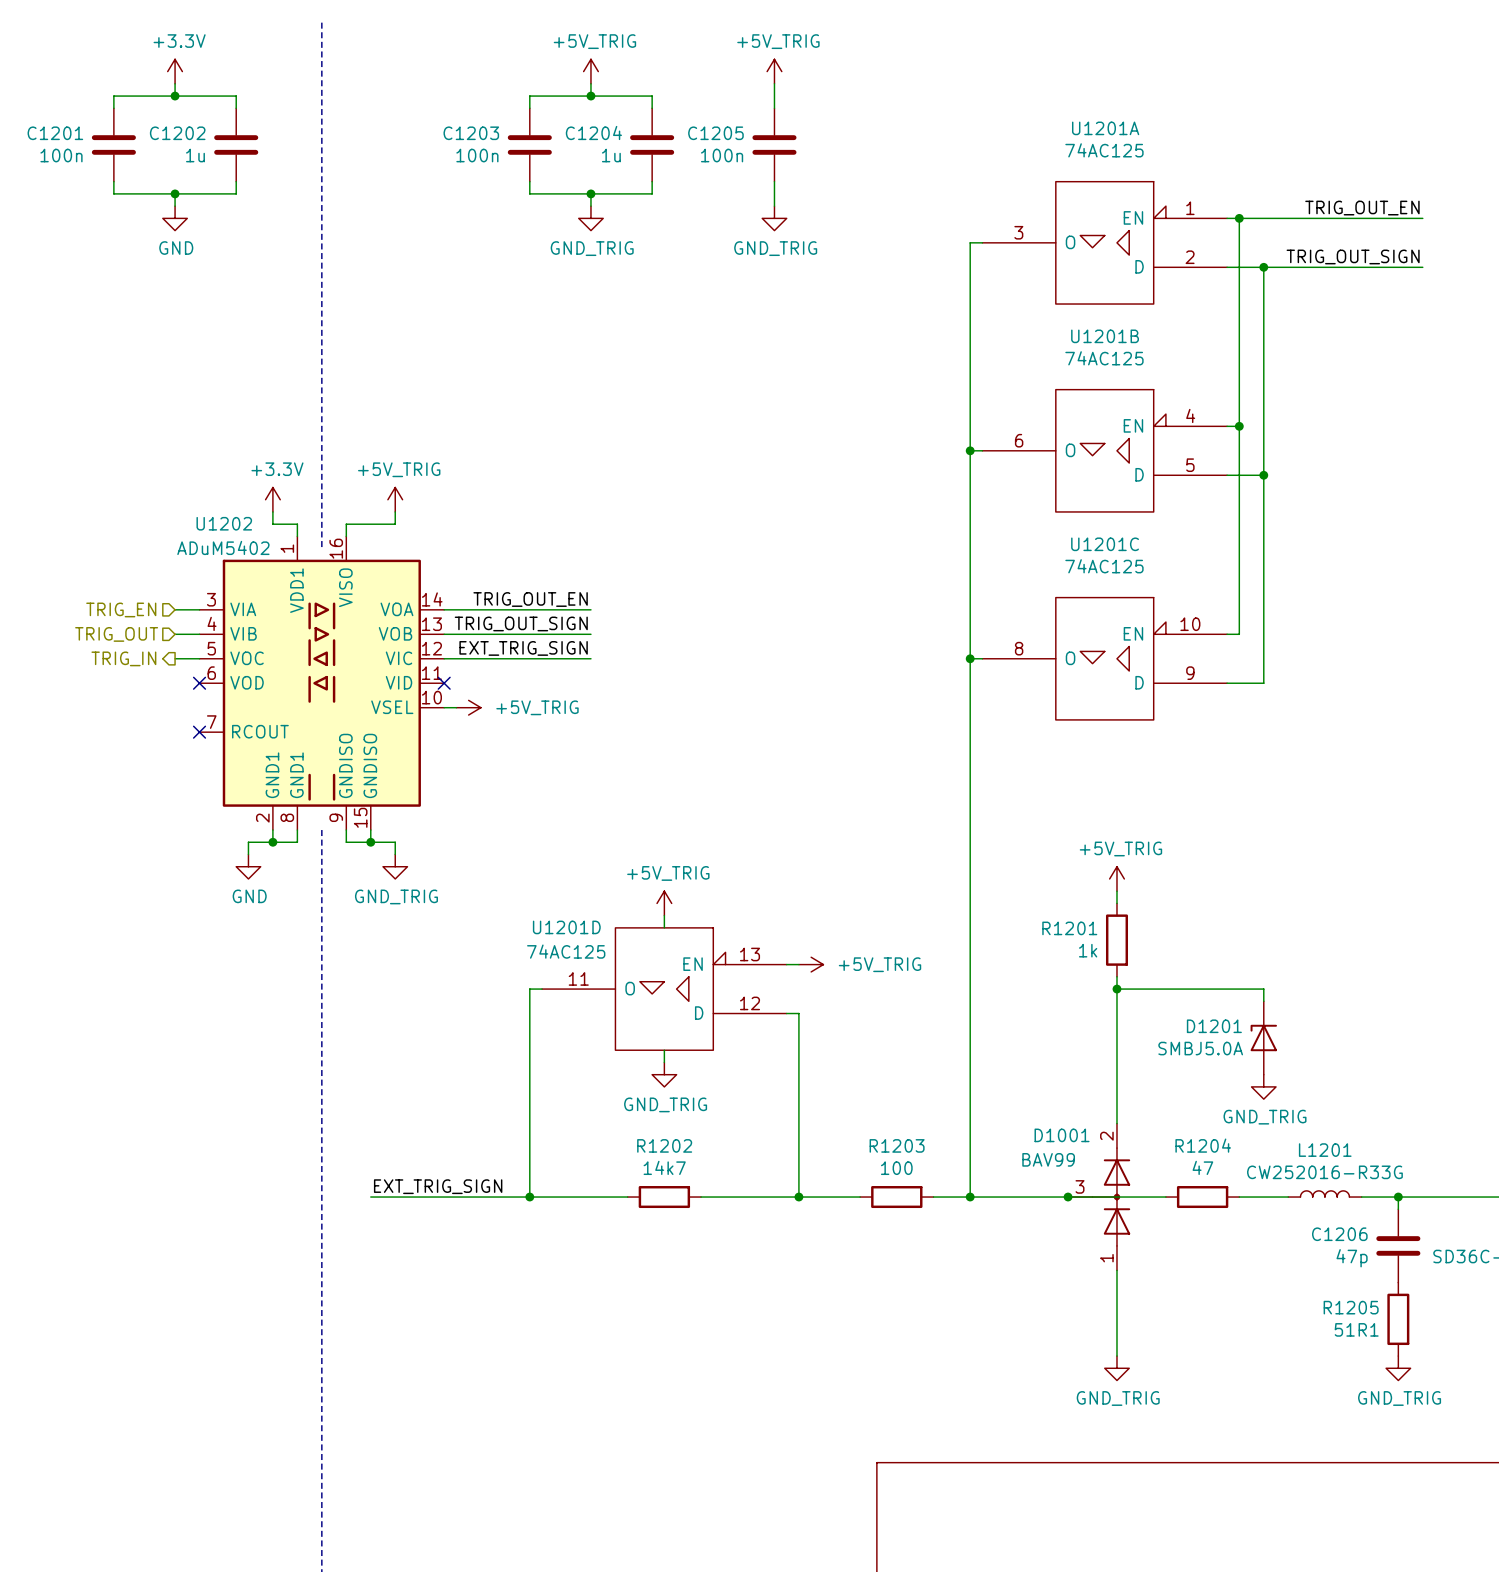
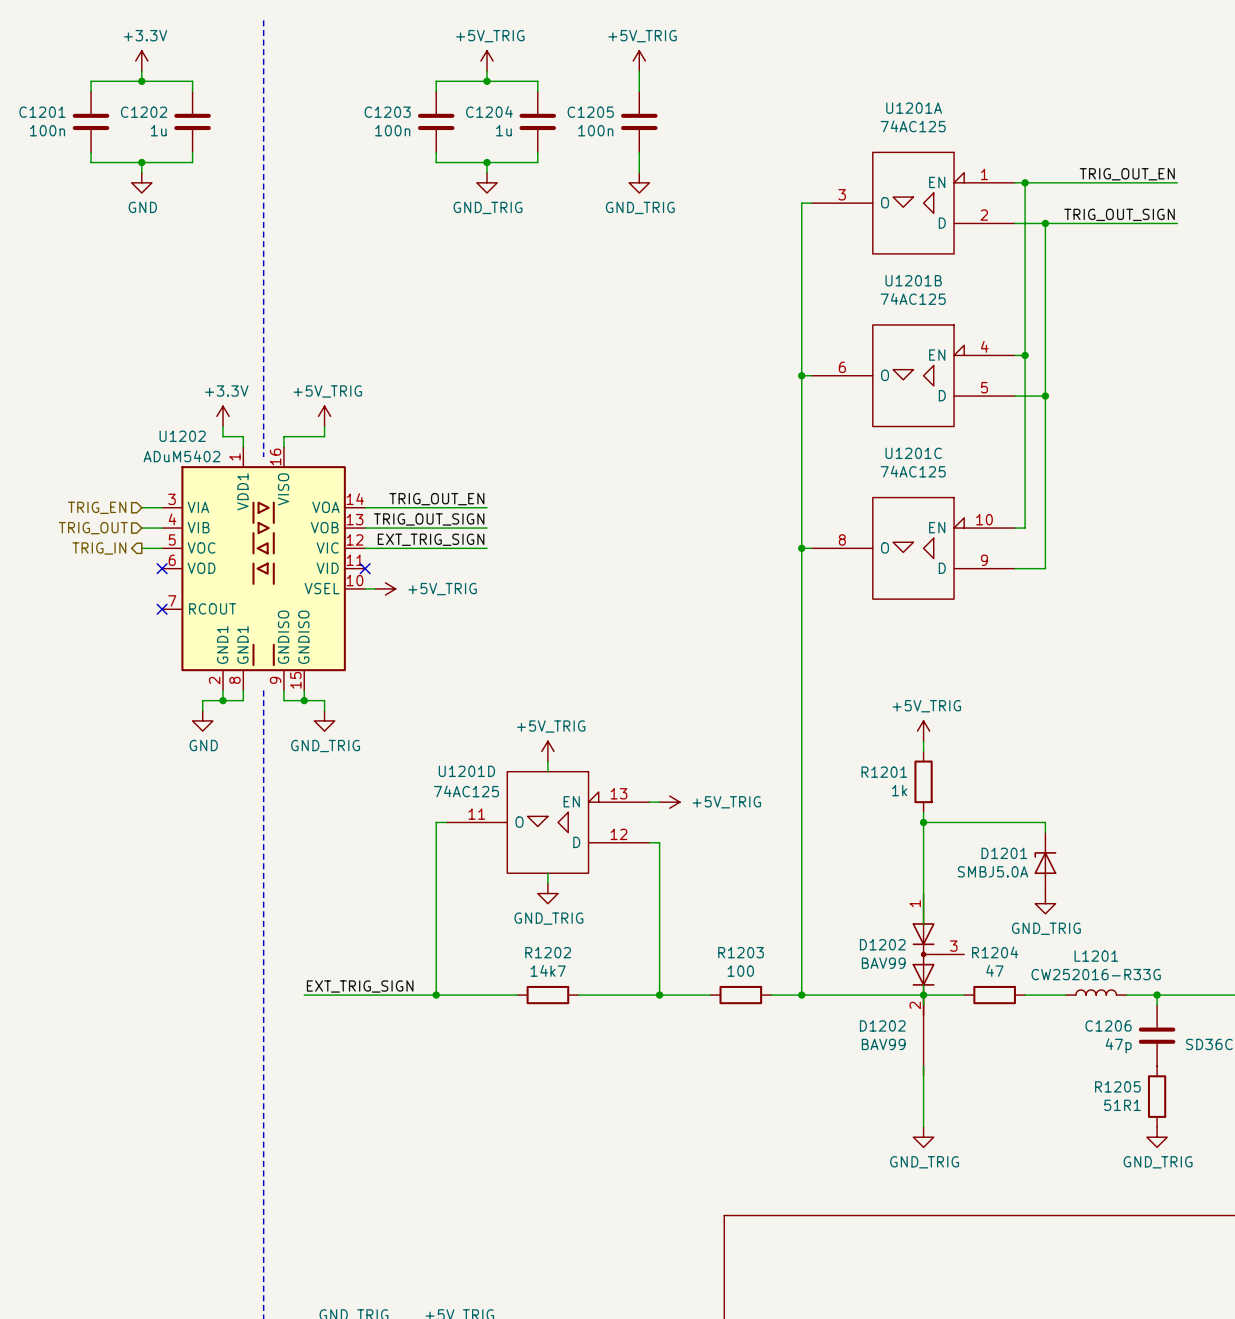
D1202: none -> BAV99 (938, 954)
junction position: (1068, 1197) -> (923, 995)
D1001: BAV99 (1099, 1197) -> none
D1202: none -> BAV99 (923, 1035)

